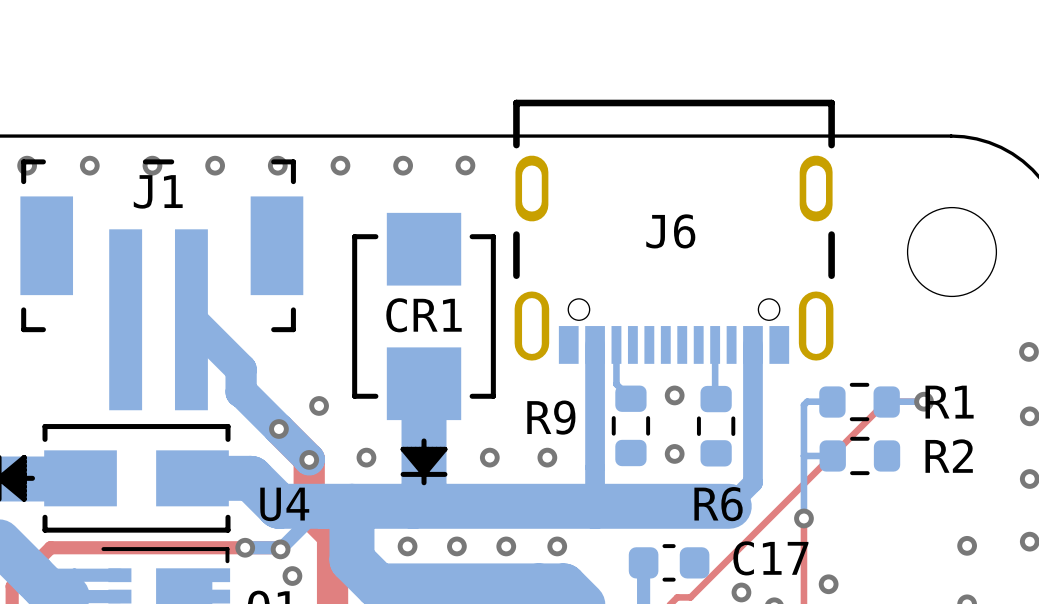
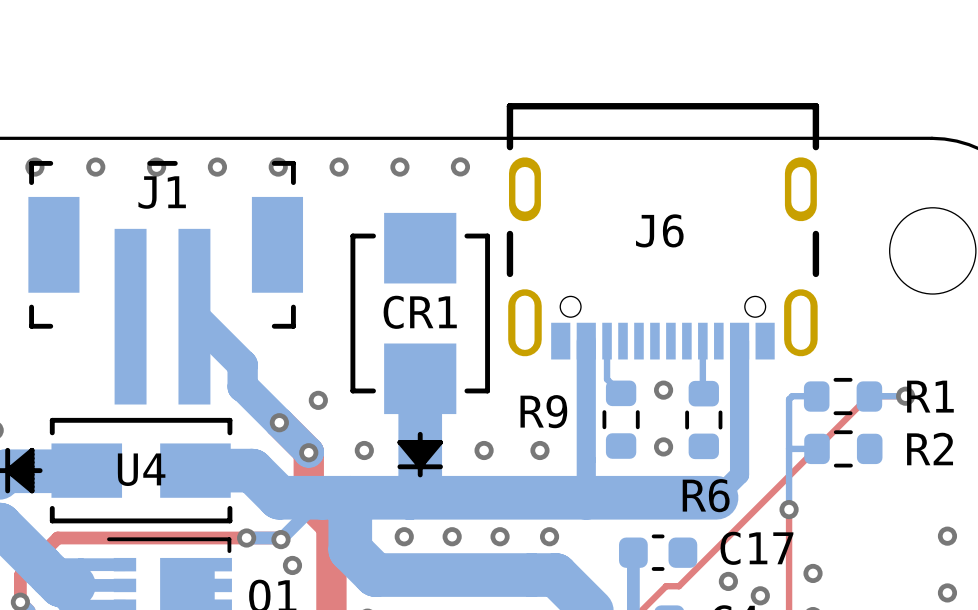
U4 name position: U4 (284, 504) -> U4 (141, 469)

